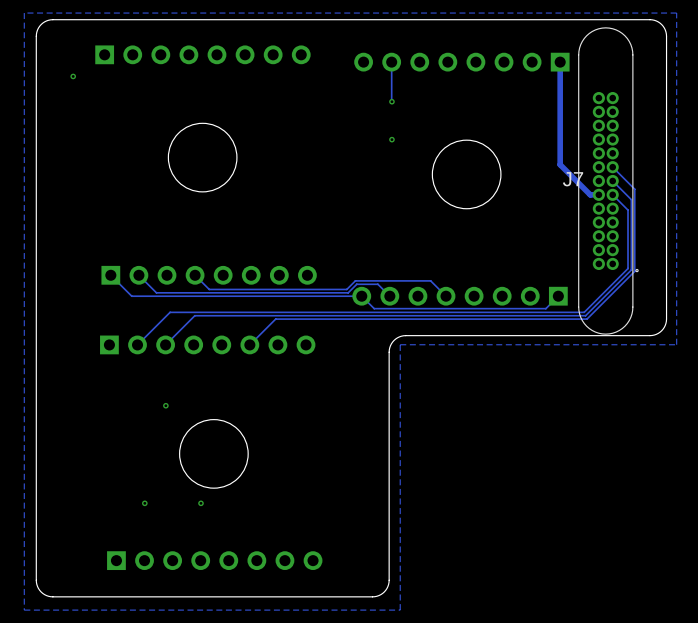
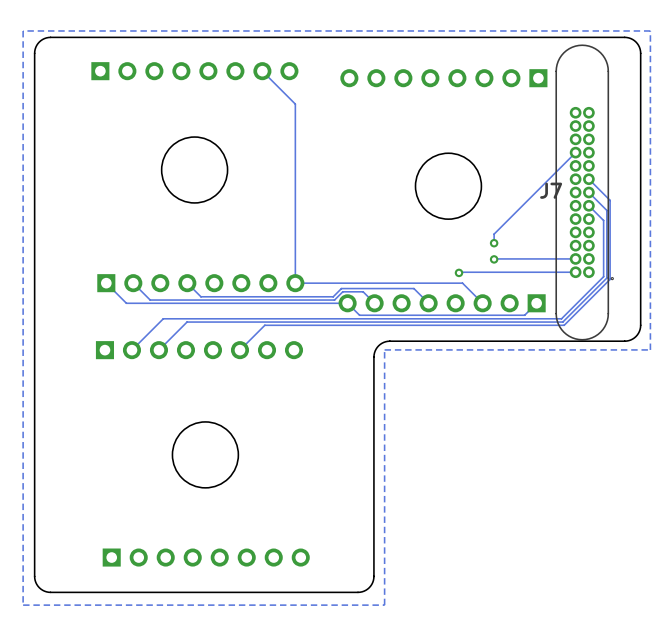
track: none -> (262, 71) (295, 104) (295, 283) (462, 283) (482, 303)
track: (391, 62) (391, 101) -> none
track: (560, 62) (560, 164) (590, 194) (598, 194) -> none
via: (73, 76) -> none
via: (391, 101) -> none
via: (391, 139) -> none
track: none -> (575, 152) (494, 234) (494, 243)
via: none -> (494, 243)
via: none -> (494, 259)
track: none -> (575, 258) (494, 259)
track: none -> (575, 272) (459, 272)
via: none -> (459, 272)
via: (165, 405) -> none
via: (144, 503) -> none
via: (200, 503) -> none

